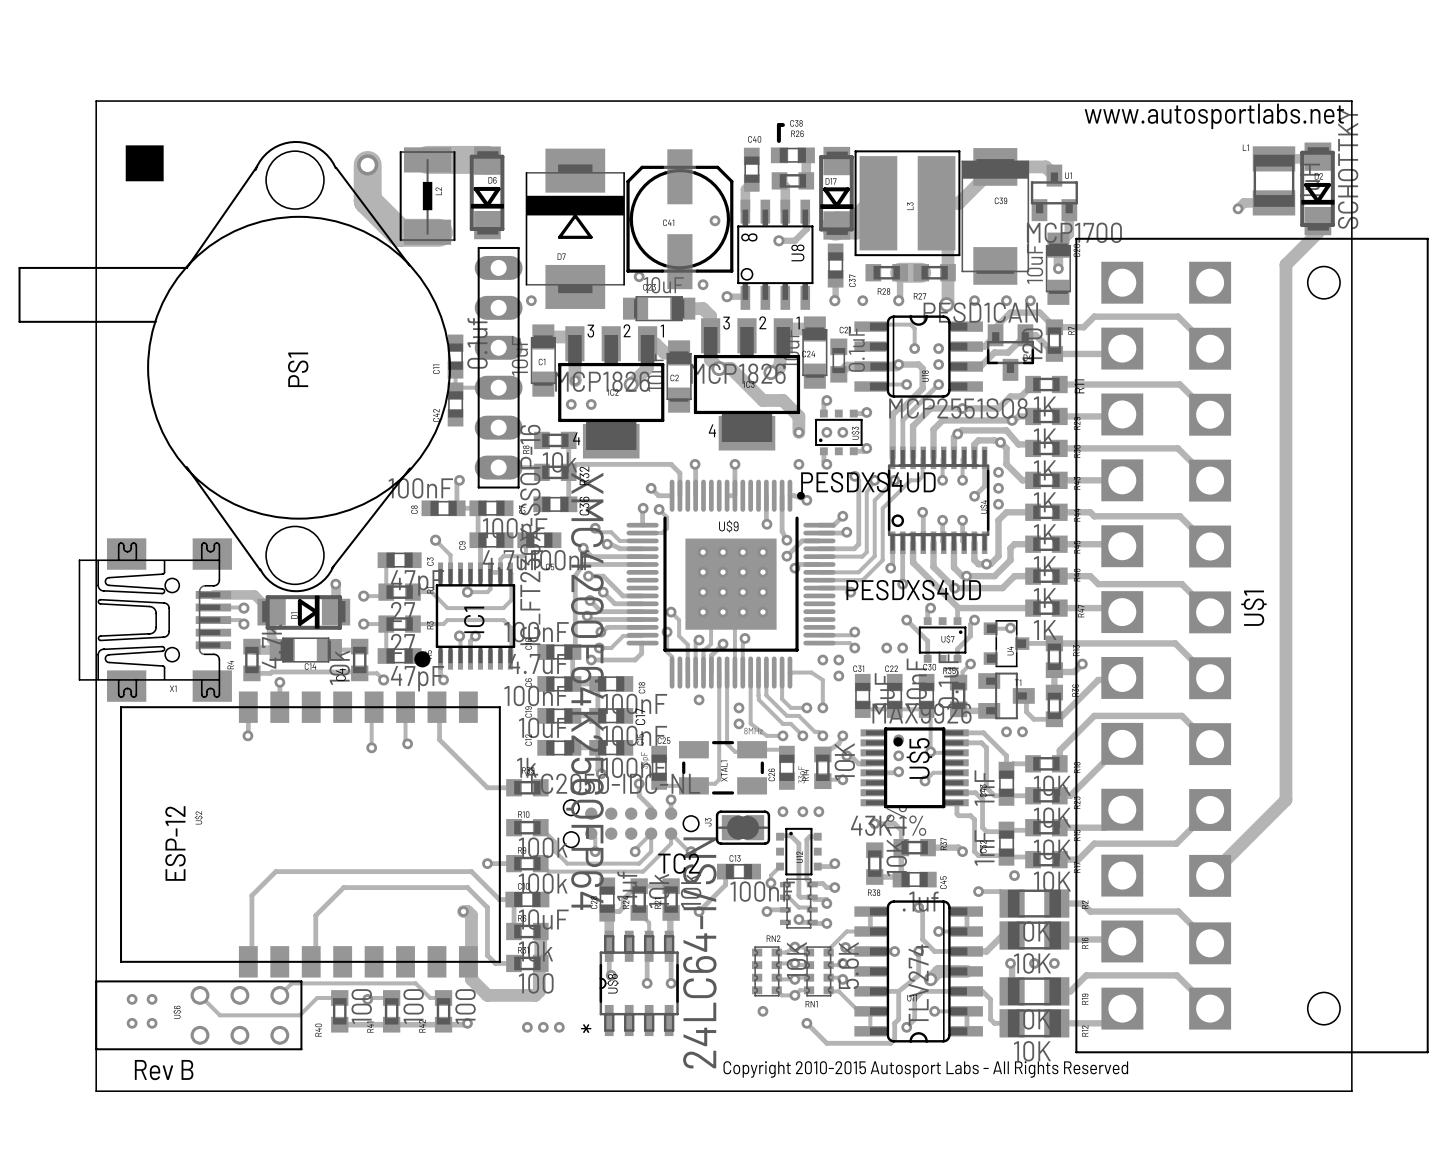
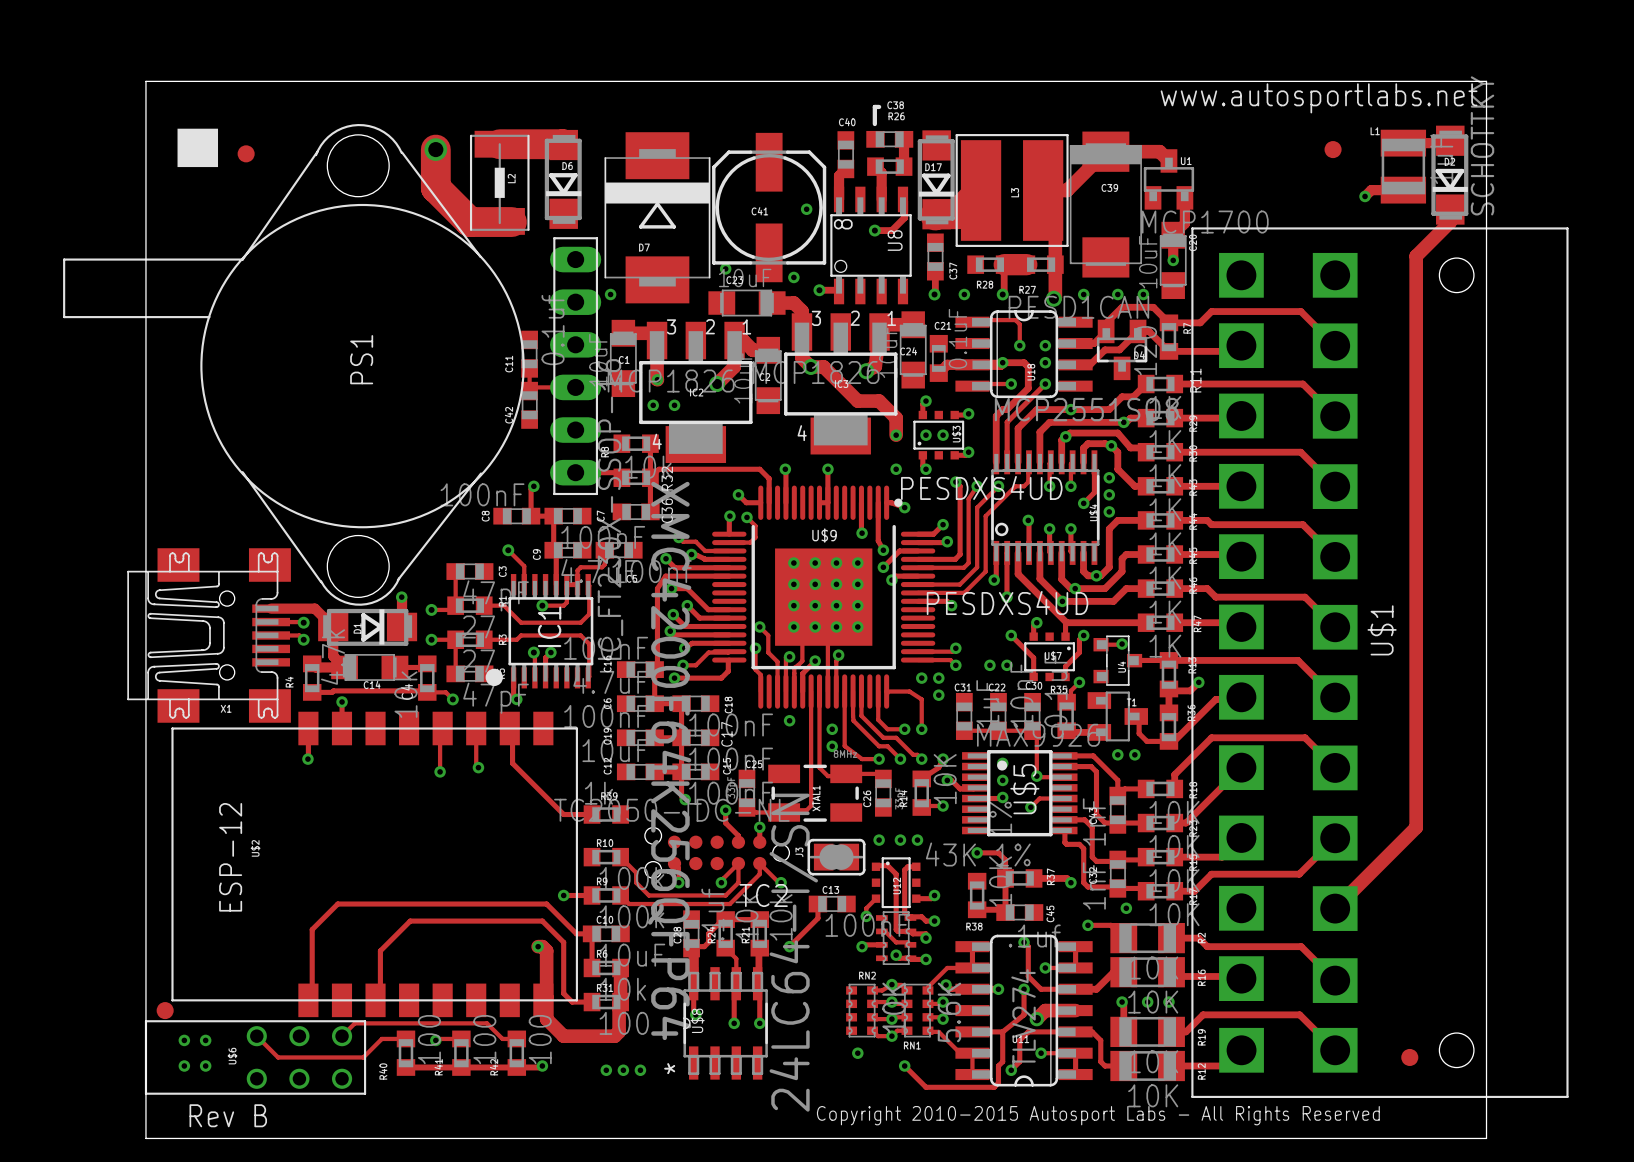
drawing: none -> [1324, 141, 1342, 159]
drawing: none -> [237, 145, 255, 163]
drawing: none -> [156, 1002, 174, 1020]
drawing: none -> [1401, 1048, 1419, 1066]

